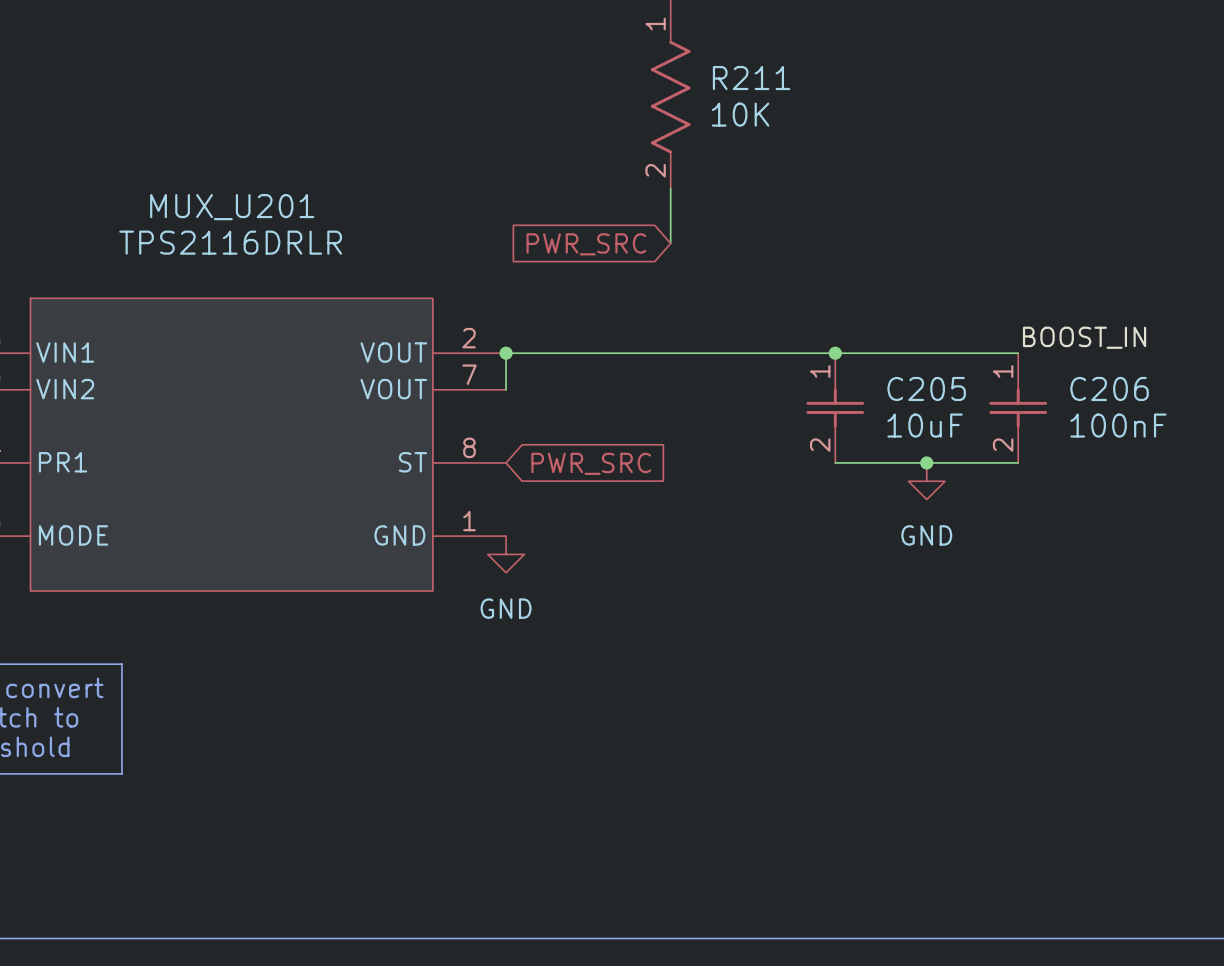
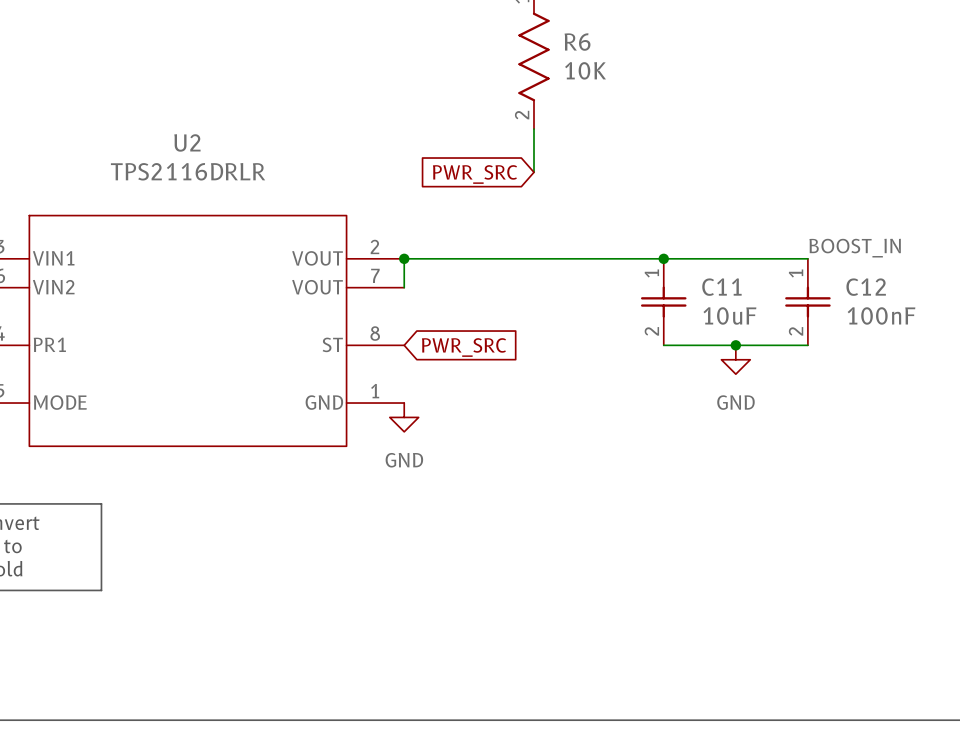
R211 name: R211 (751, 78) -> R6 (577, 42)
MUX_U201 name: MUX_U201 (232, 207) -> U2 (187, 142)
C205 name: C205 (926, 388) -> C11 (721, 287)
C206 name: C206 (1109, 388) -> C12 (866, 287)

